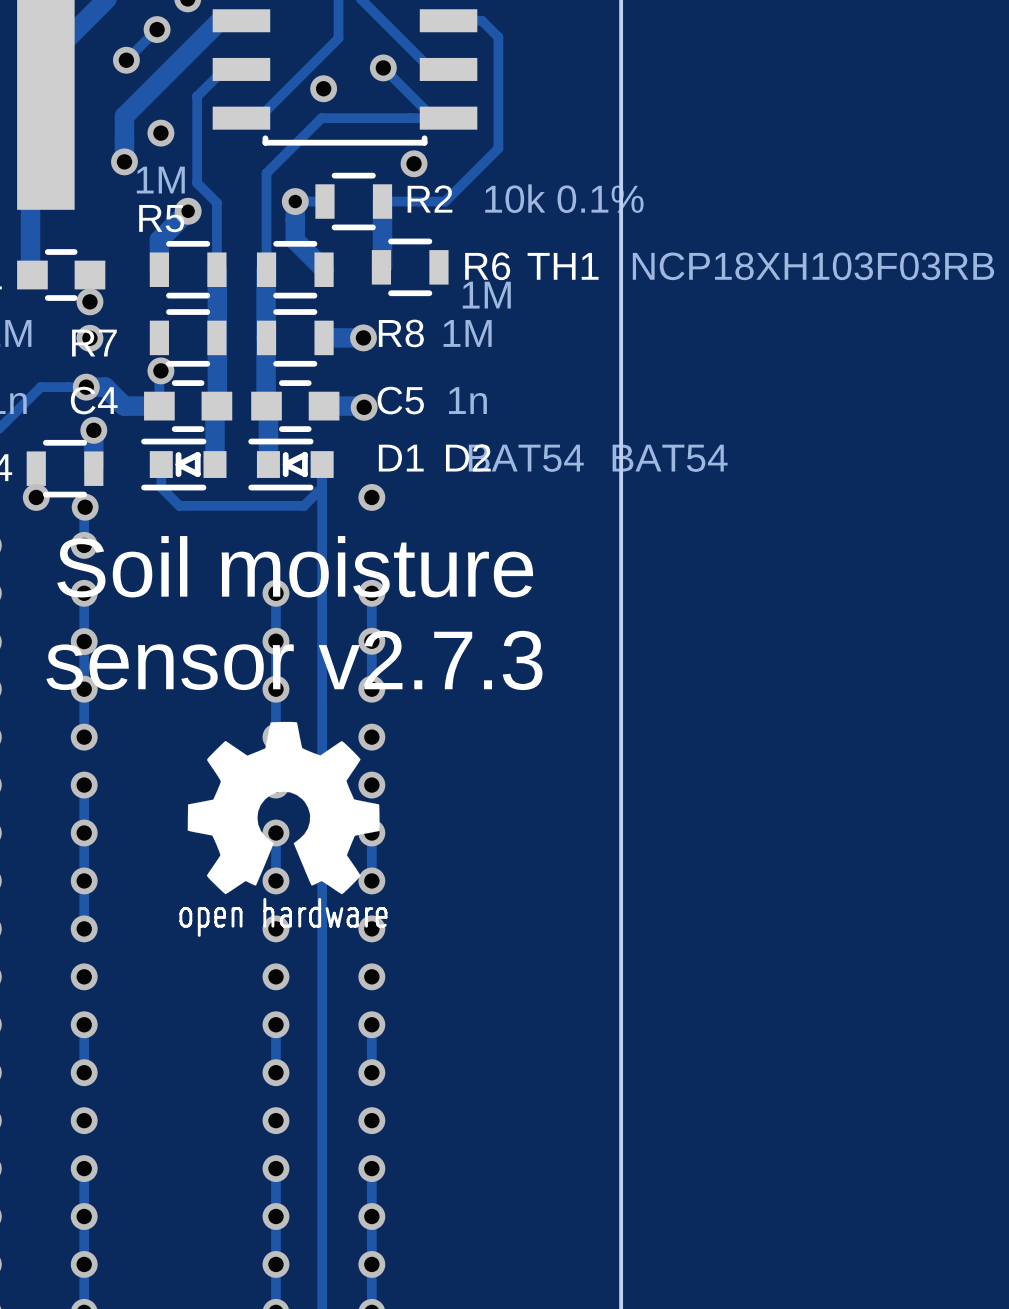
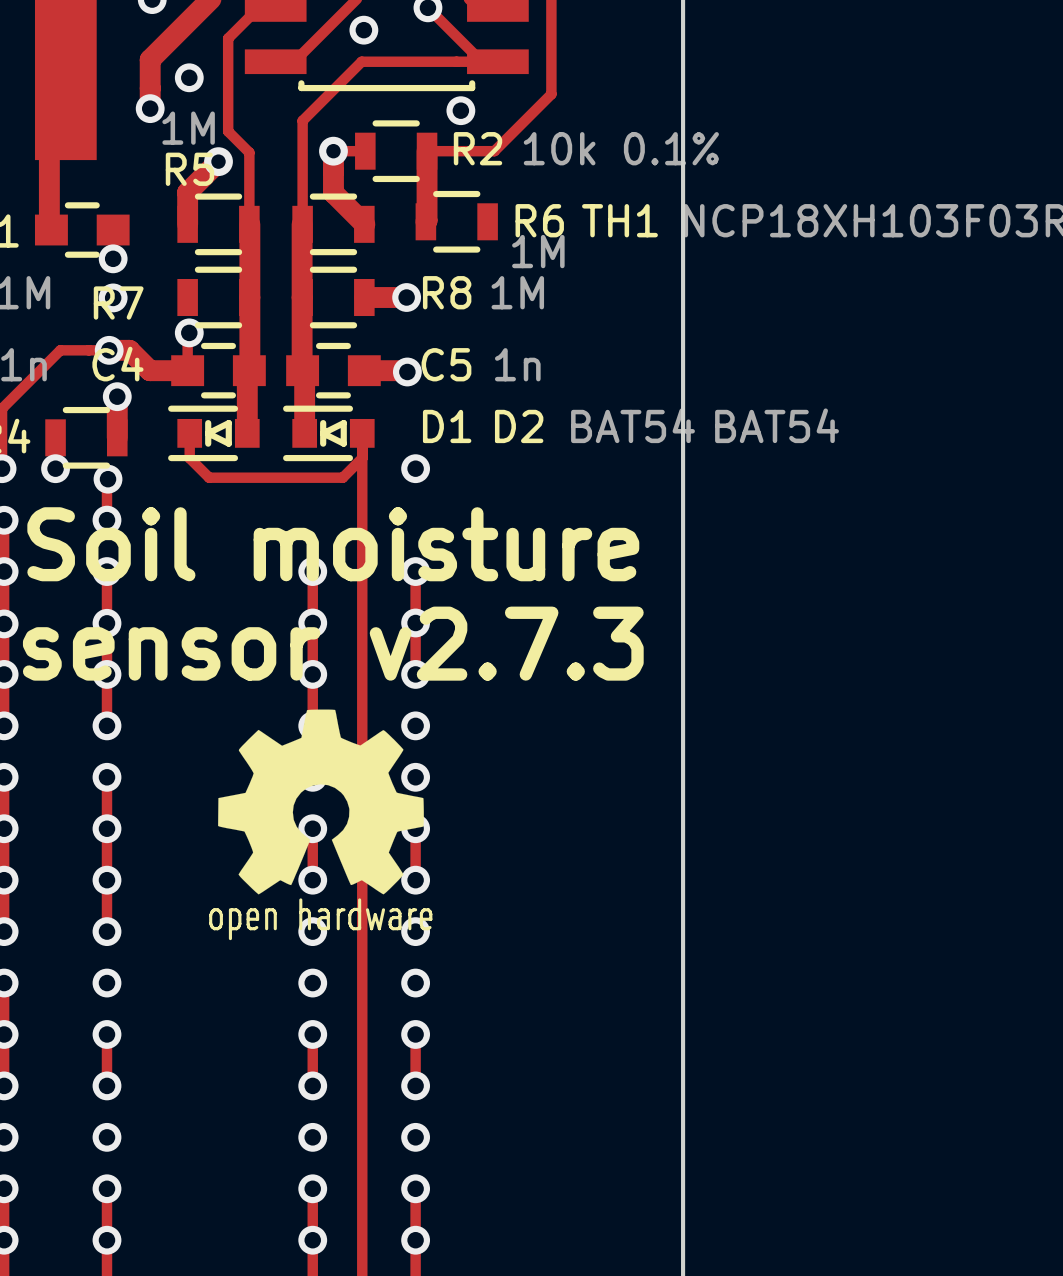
D2 value position: BAT54 (526, 458) -> BAT54 (633, 425)
D1 value position: BAT54 (670, 458) -> BAT54 (777, 425)

